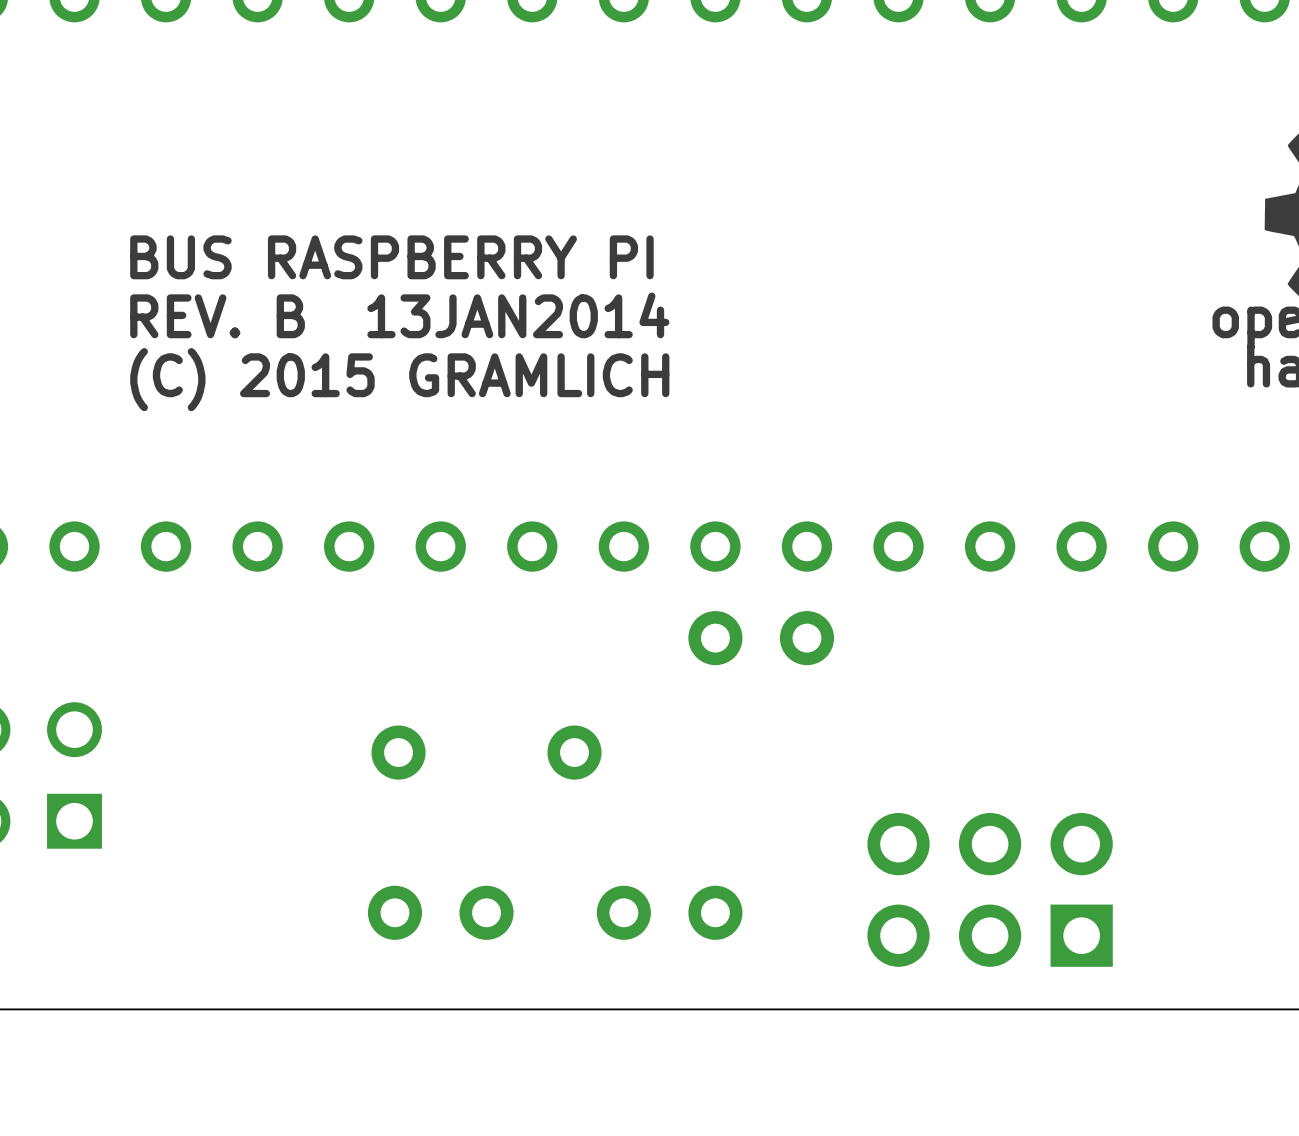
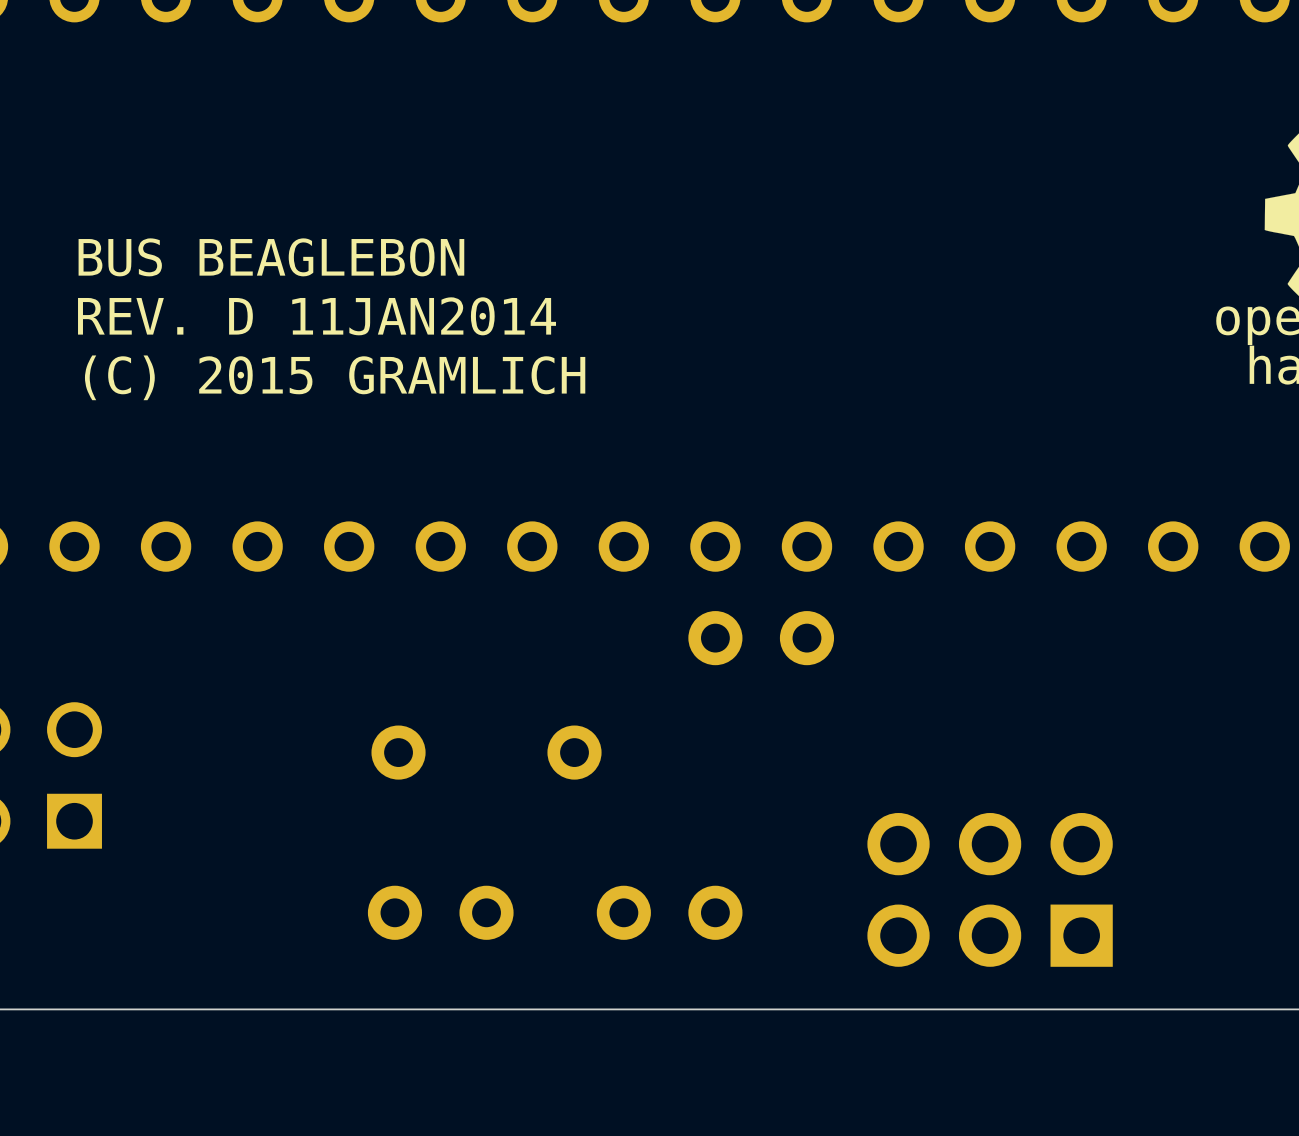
text: none -> BUS BEAGLEBON (271, 257)
text: BUS RASPBERRY PI (391, 257) -> none
text: REV. B 13JAN2014 (399, 315) -> REV. D 11JAN2014 (317, 316)
text position: (C) 2015 GRAMLICH (399, 379) -> (C) 2015 GRAMLICH (335, 377)

